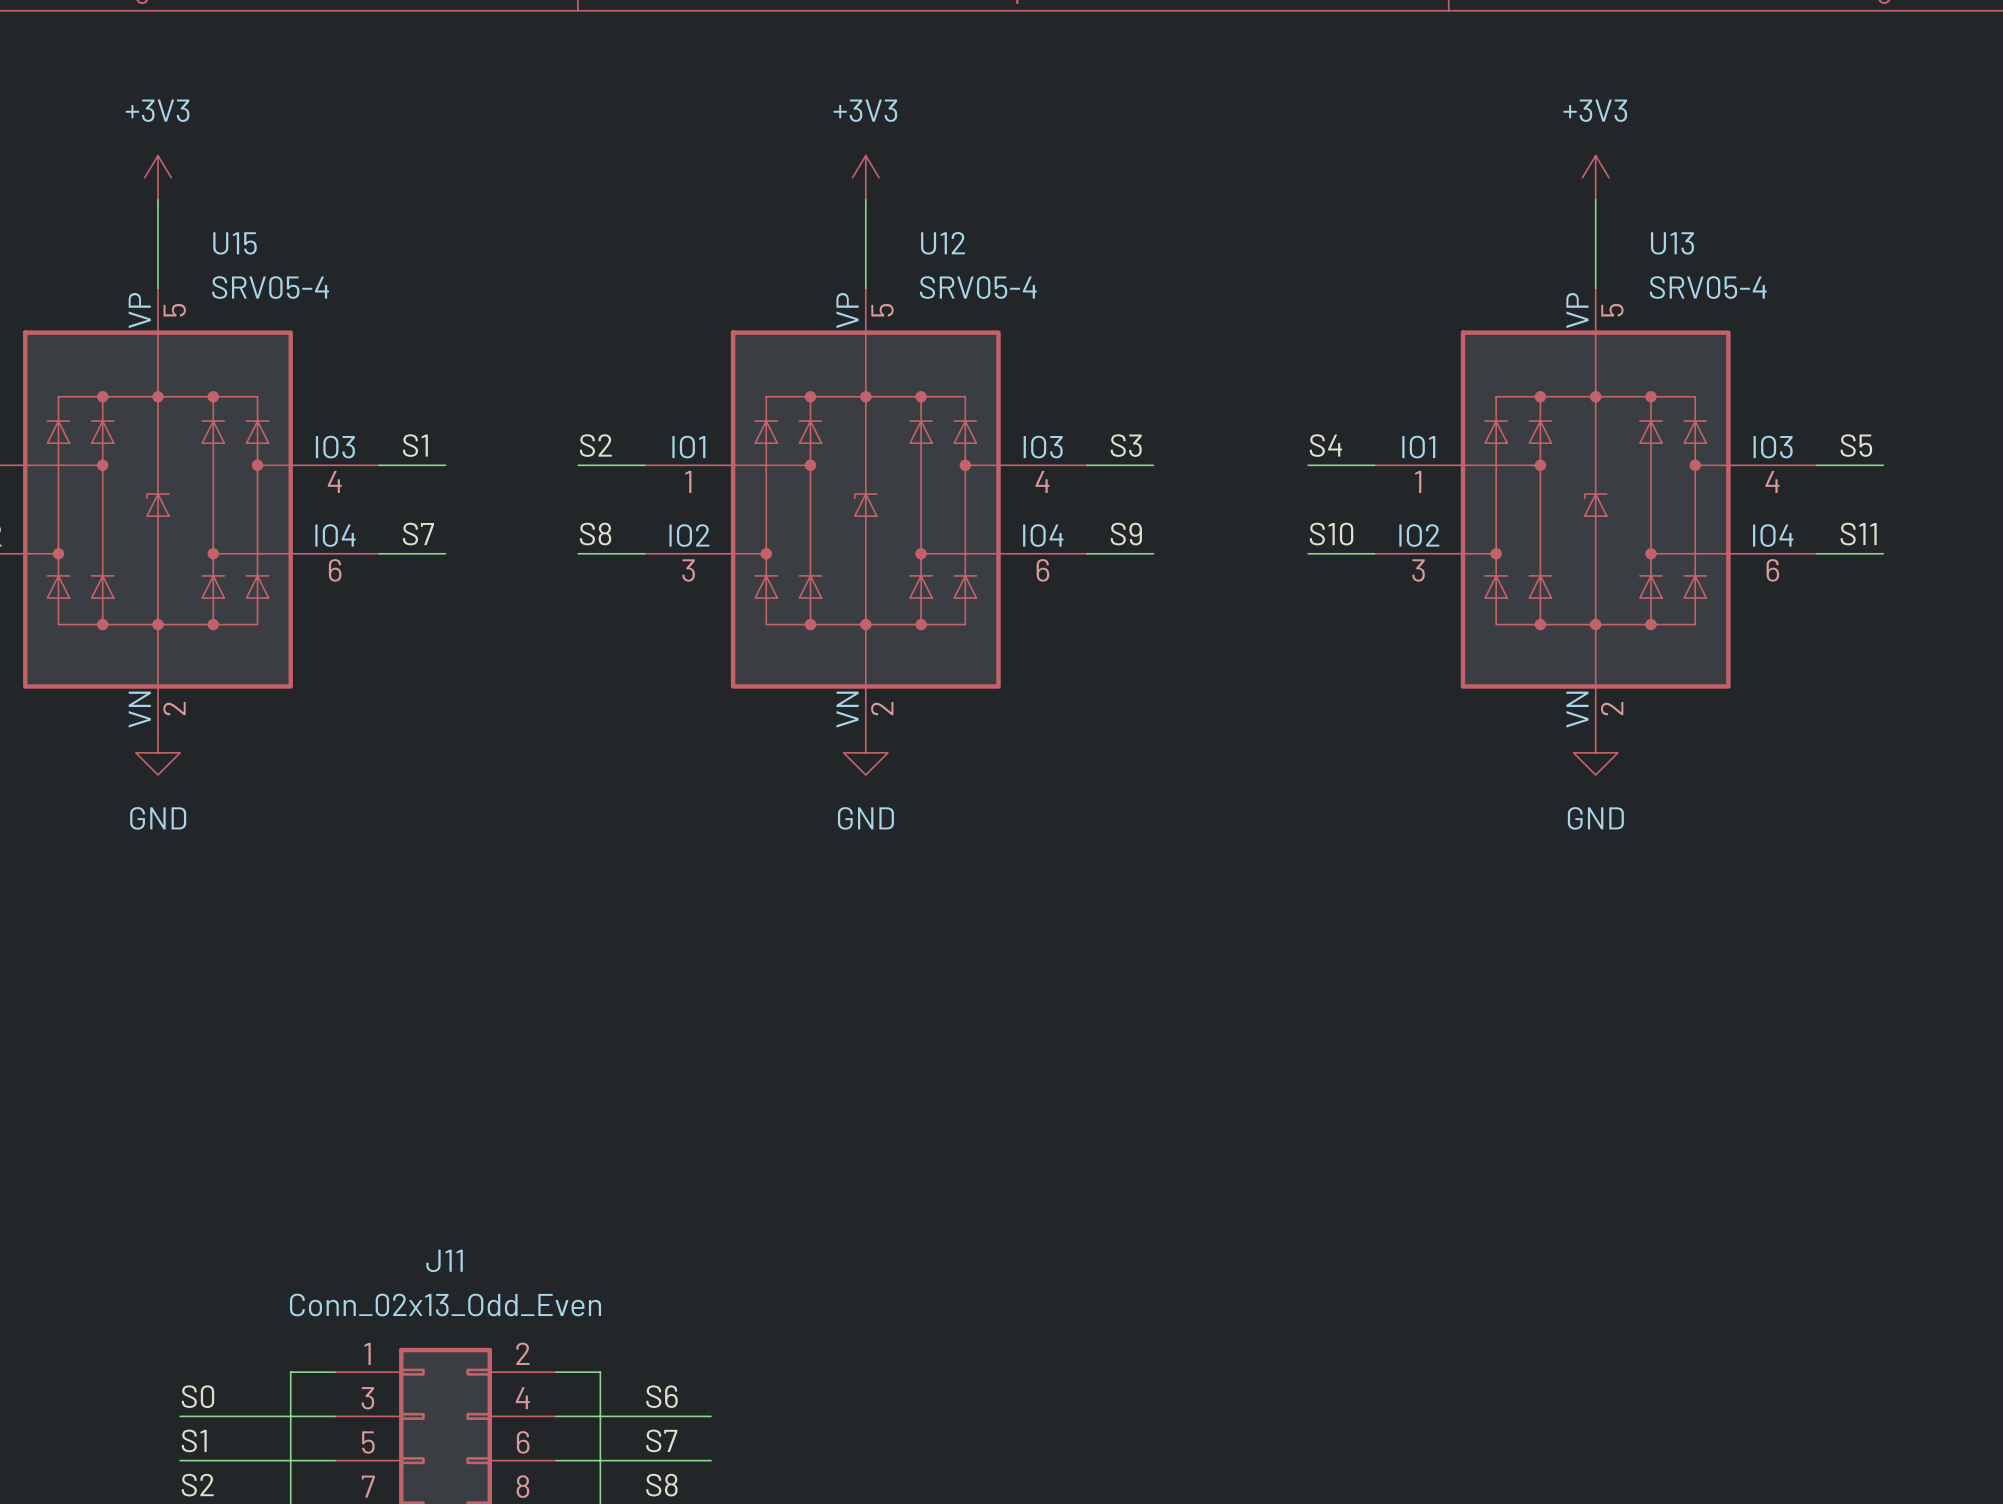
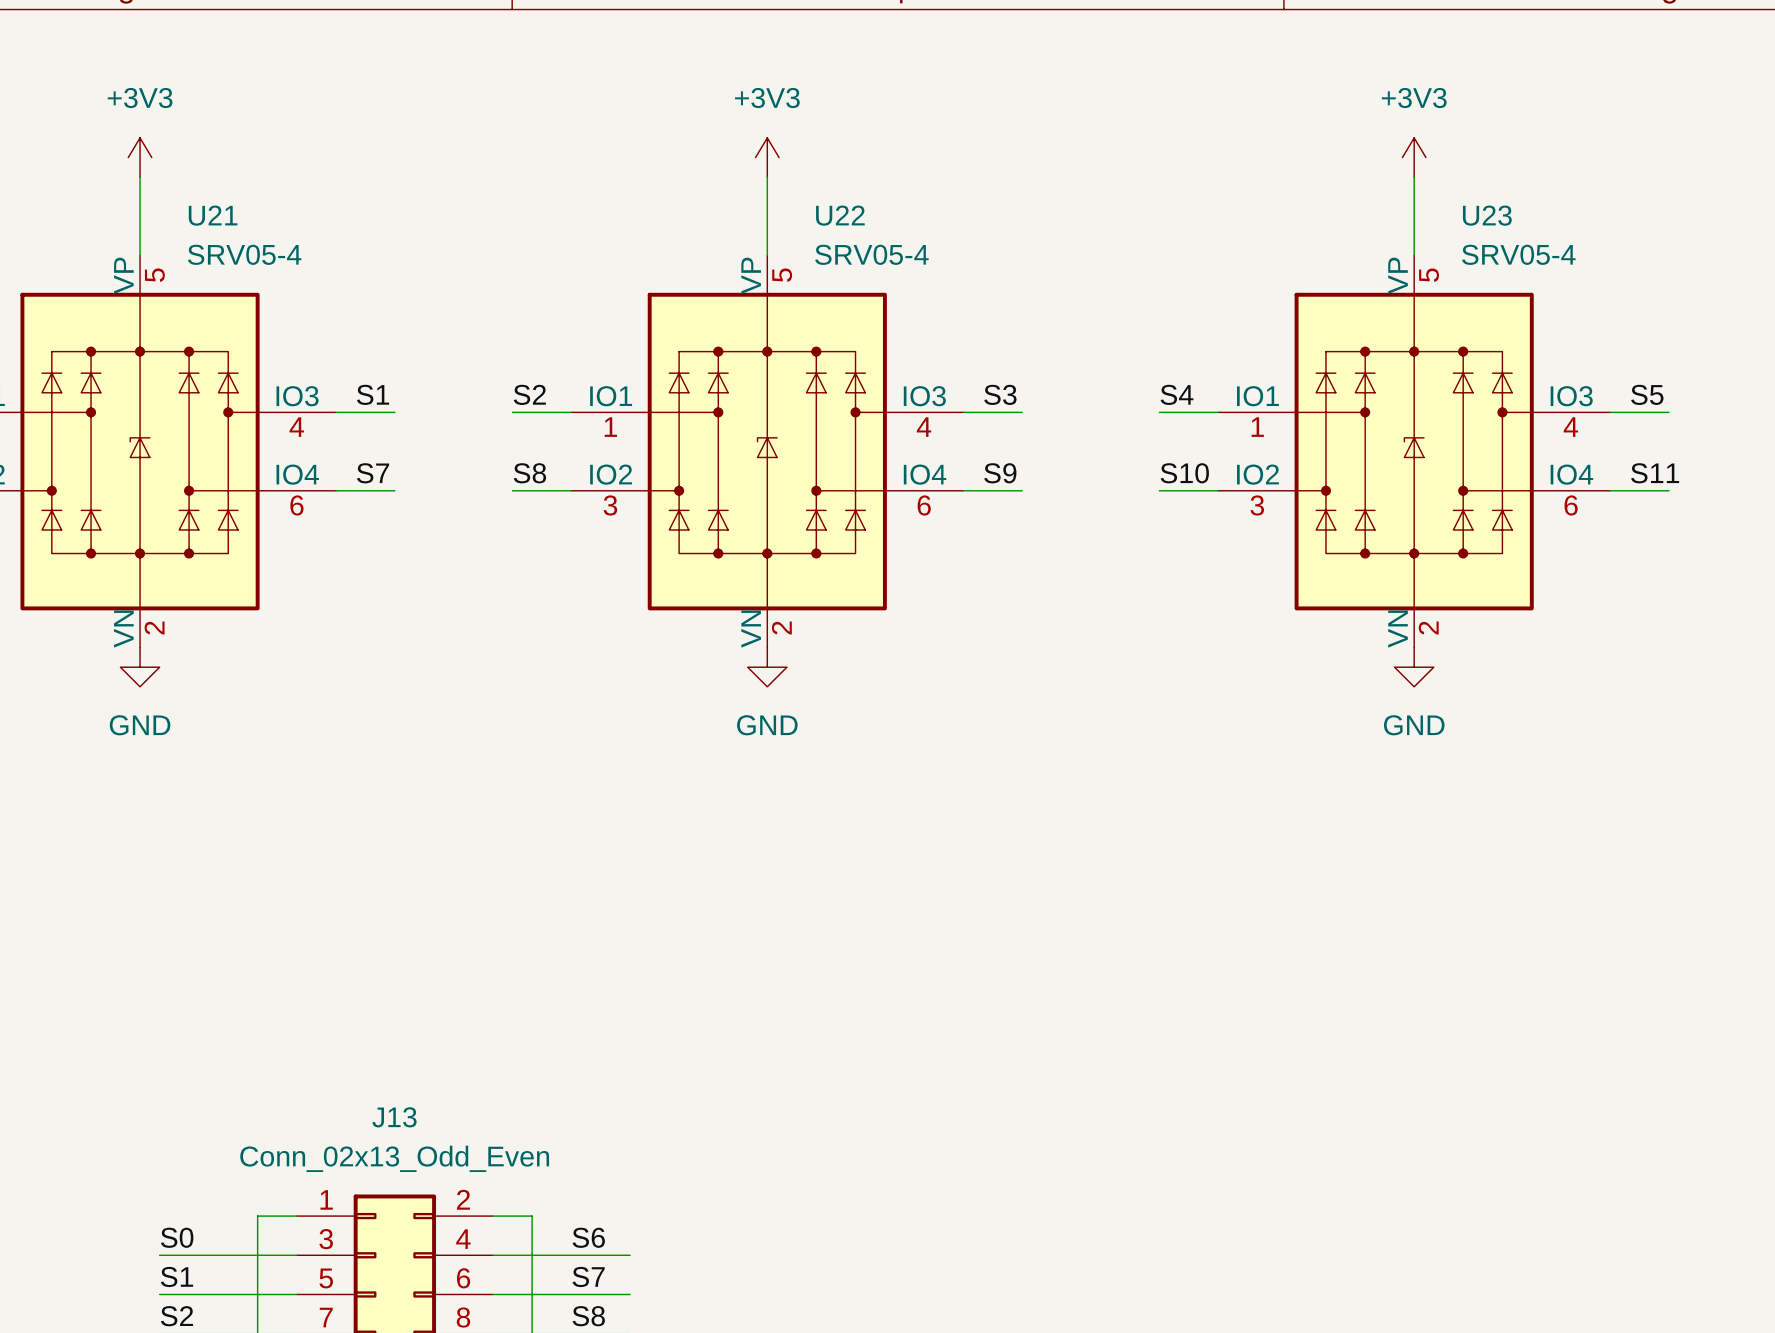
U15 name: U15 (234, 243) -> U21 (213, 215)
U12 name: U12 (943, 243) -> U22 (840, 215)
U13 name: U13 (1672, 243) -> U23 (1487, 215)
J11 name: J11 (444, 1260) -> J13 (394, 1117)

